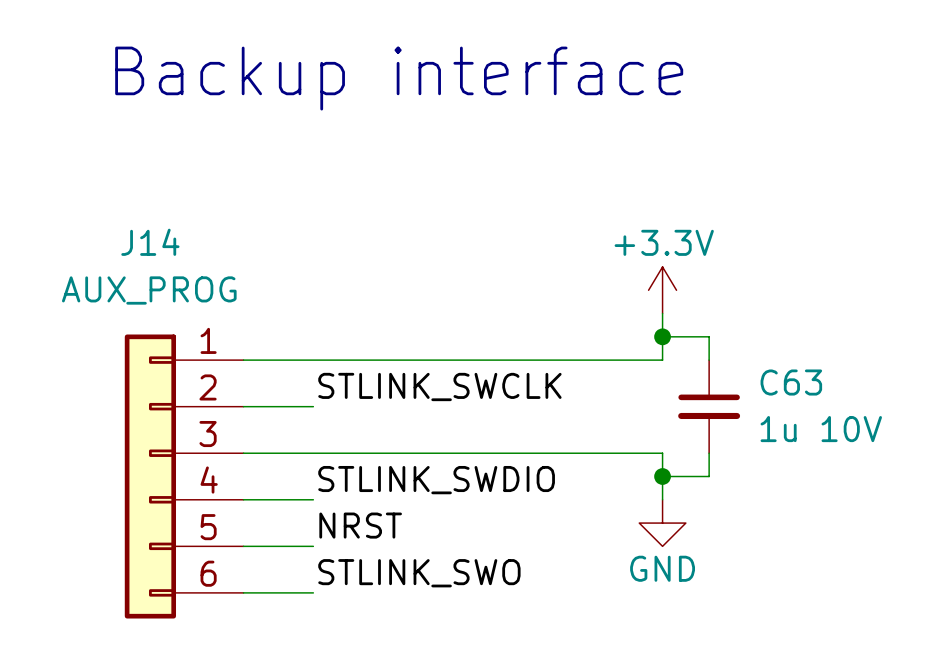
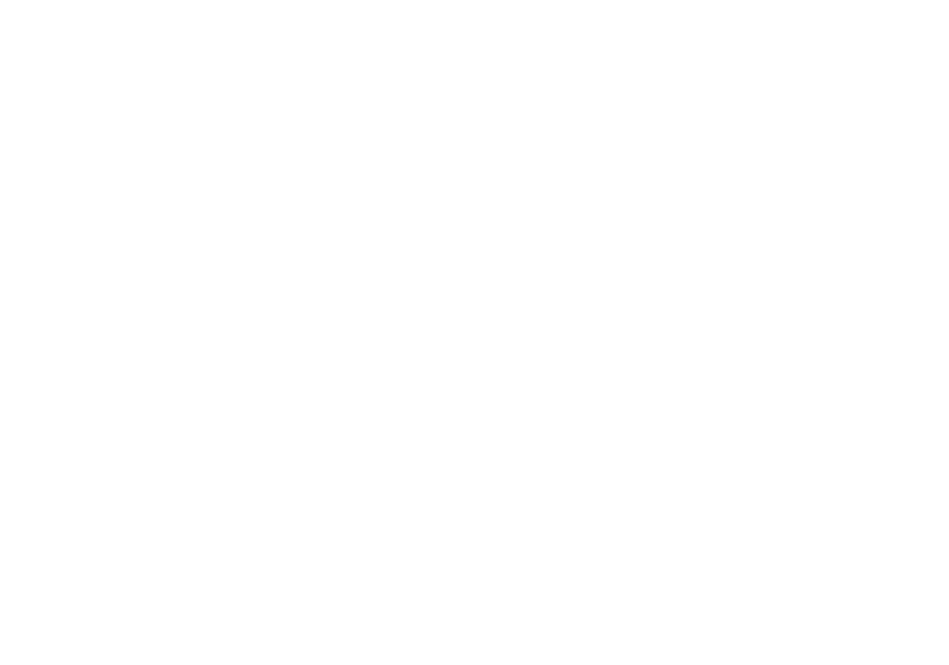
text: Backup interface (399, 78) -> none
power symbol: +3.3V (662, 290) -> none
wire: (662, 313) (662, 360) (243, 360) -> none
wire: (662, 336) (709, 336) (709, 360) -> none
junction: (662, 336) -> none
label: STLINK_SWCLK (439, 387) -> none
wire: (243, 406) (313, 406) -> none
C63: 1u 10V (709, 406) -> none
wire: (243, 453) (662, 453) (662, 499) -> none
wire: (709, 453) (709, 476) (662, 476) -> none
J14: AUX_PROG (184, 476) -> none
junction: (662, 476) -> none
label: STLINK_SWDIO (436, 480) -> none
wire: (243, 499) (313, 499) -> none
power symbol: GND (662, 523) -> none
label: NRST (360, 525) -> none
wire: (243, 546) (313, 546) -> none
label: STLINK_SWO (419, 573) -> none
wire: (243, 592) (313, 592) -> none

